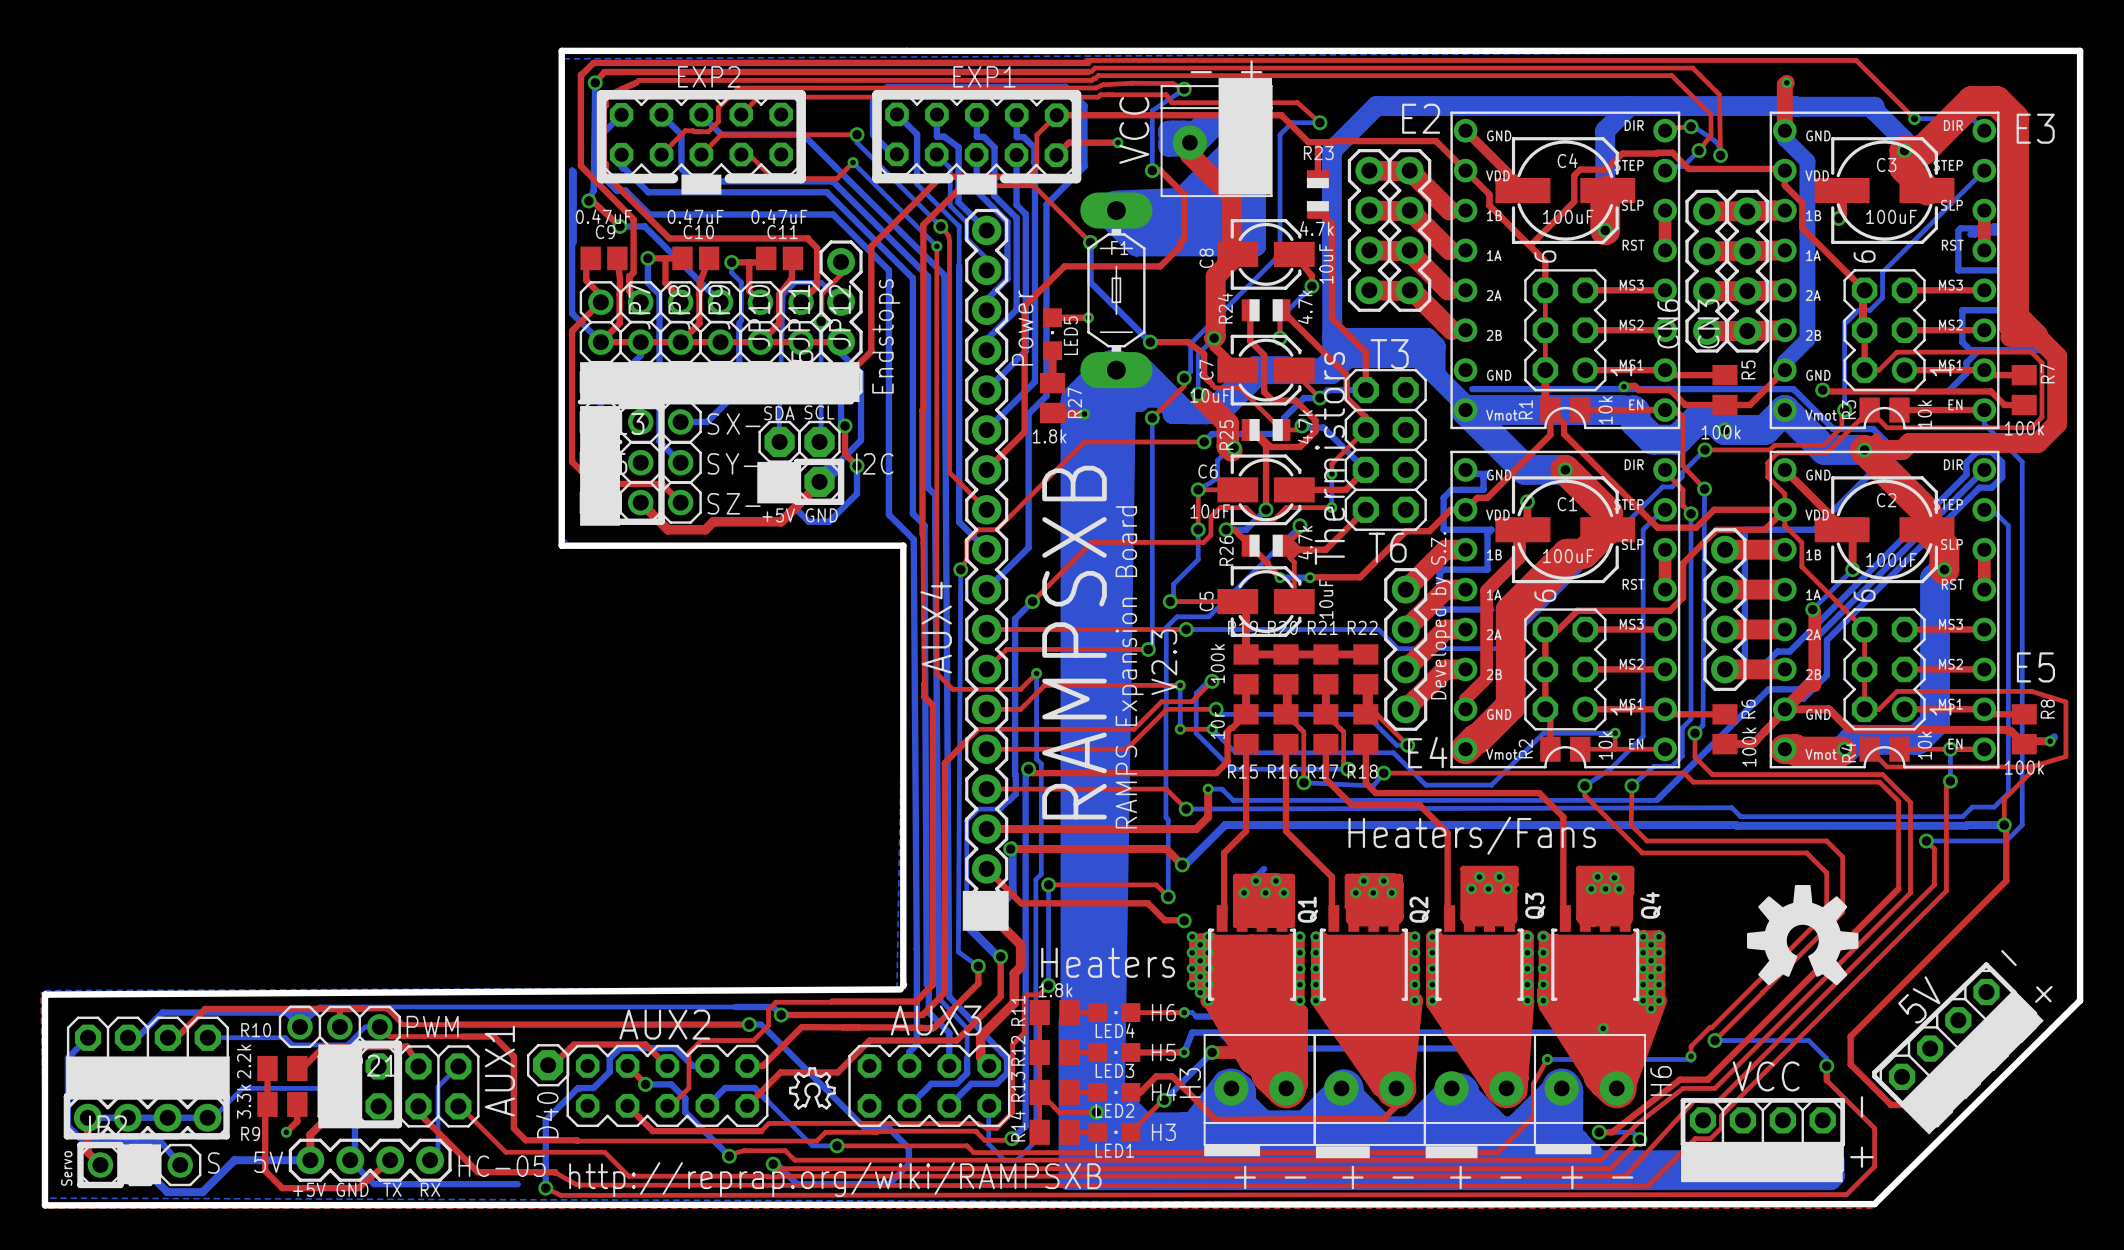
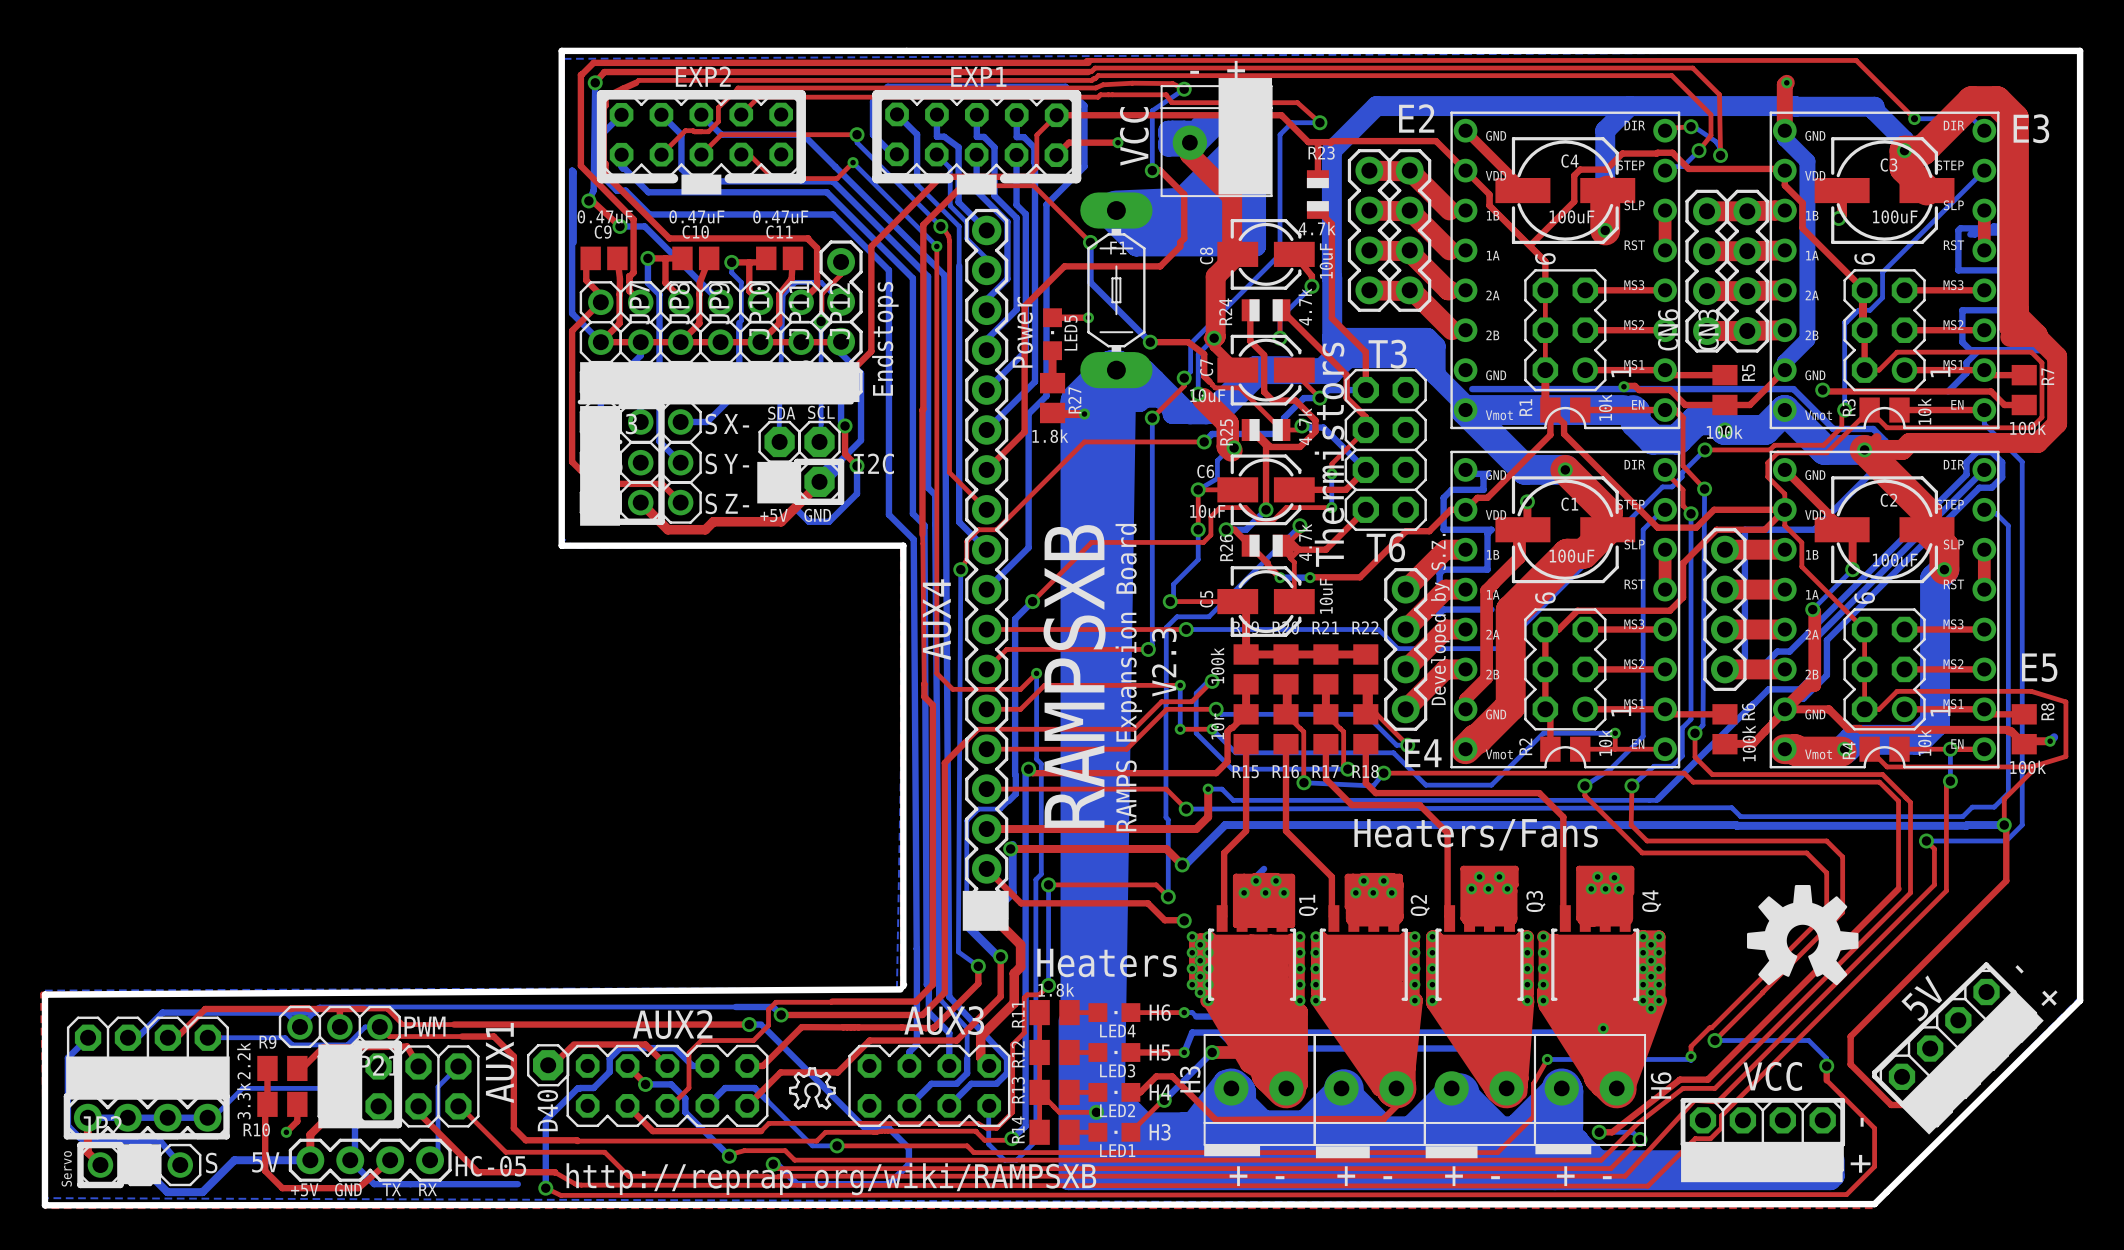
text position: R10 (256, 1030) -> R10 (256, 1129)
text position: R9 (250, 1133) -> R9 (267, 1042)

